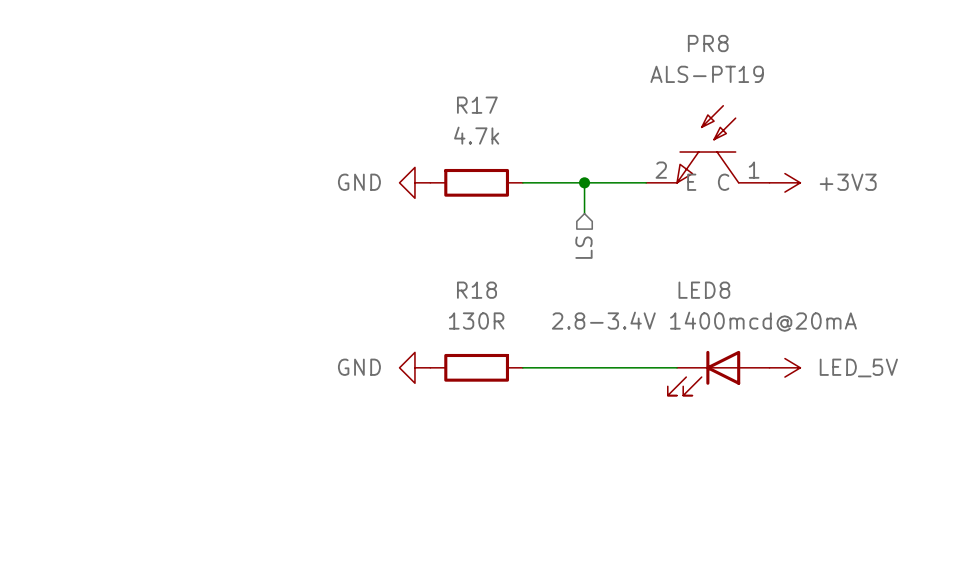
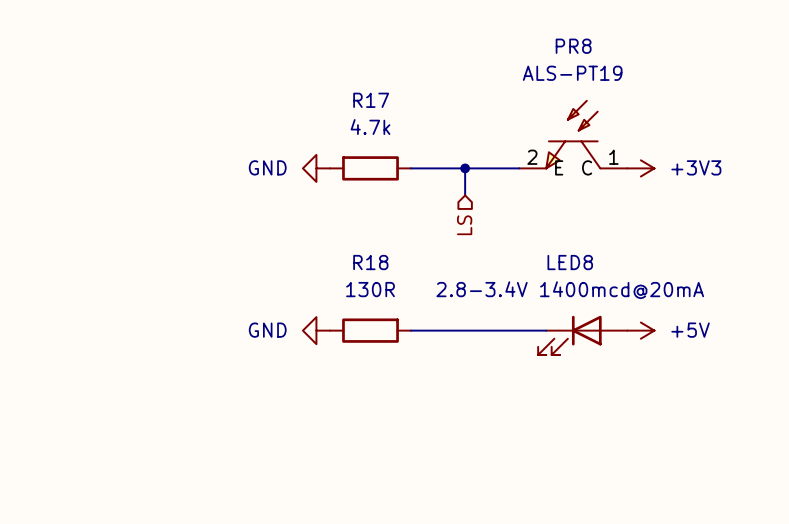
power symbol: LED_5V (784, 367) -> +5V (640, 330)

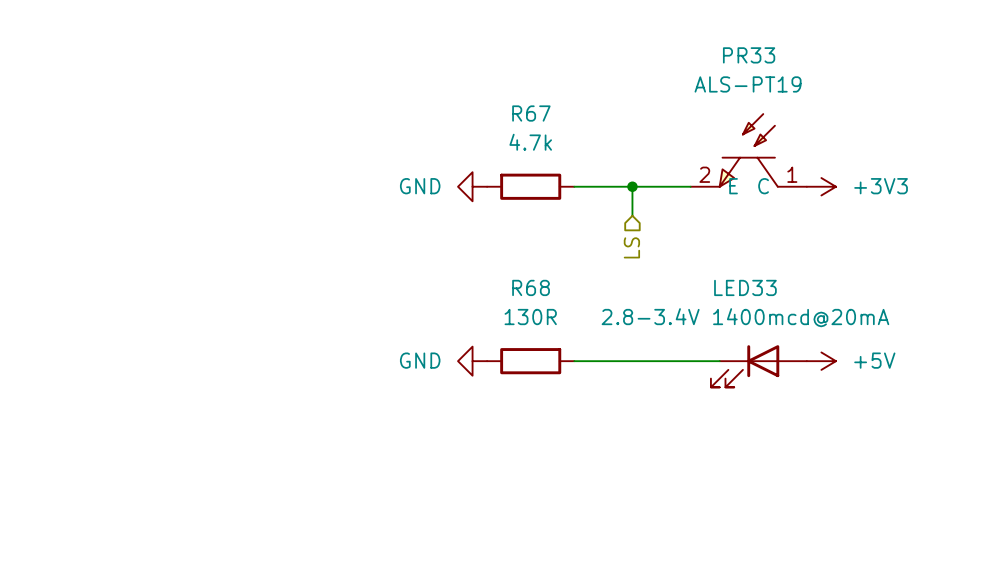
PR8 name: PR8 (573, 46) -> PR33 (749, 55)
R17 name: R17 (371, 100) -> R67 (531, 113)
R18 name: R18 (370, 262) -> R68 (531, 287)
LED8 name: LED8 (570, 262) -> LED33 (745, 287)

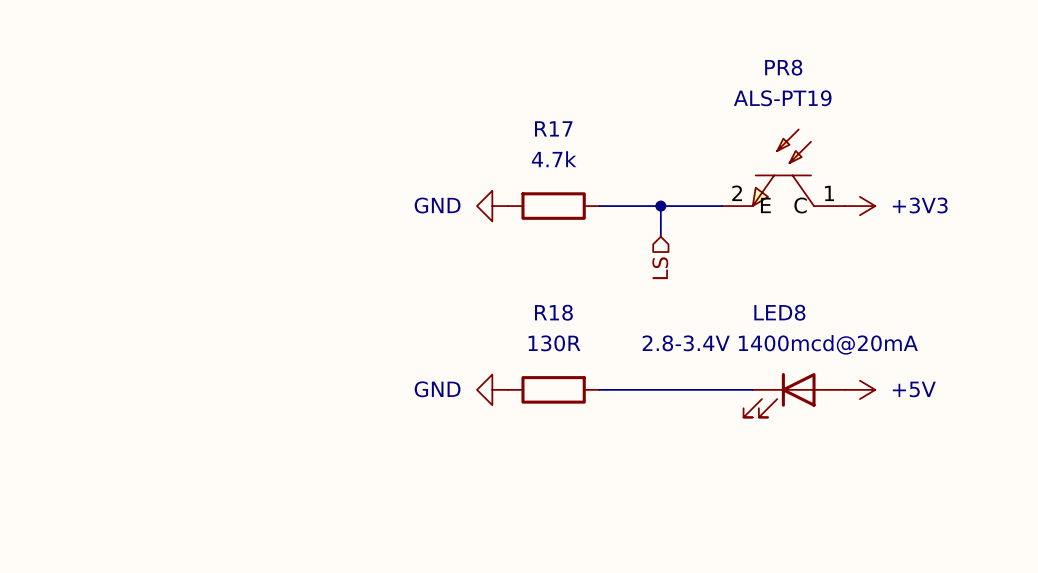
PR33 name: PR33 (749, 55) -> PR8 (783, 67)
R67 name: R67 (531, 113) -> R17 (553, 128)
R68 name: R68 (531, 287) -> R18 (553, 312)
LED33 name: LED33 (745, 287) -> LED8 (779, 312)

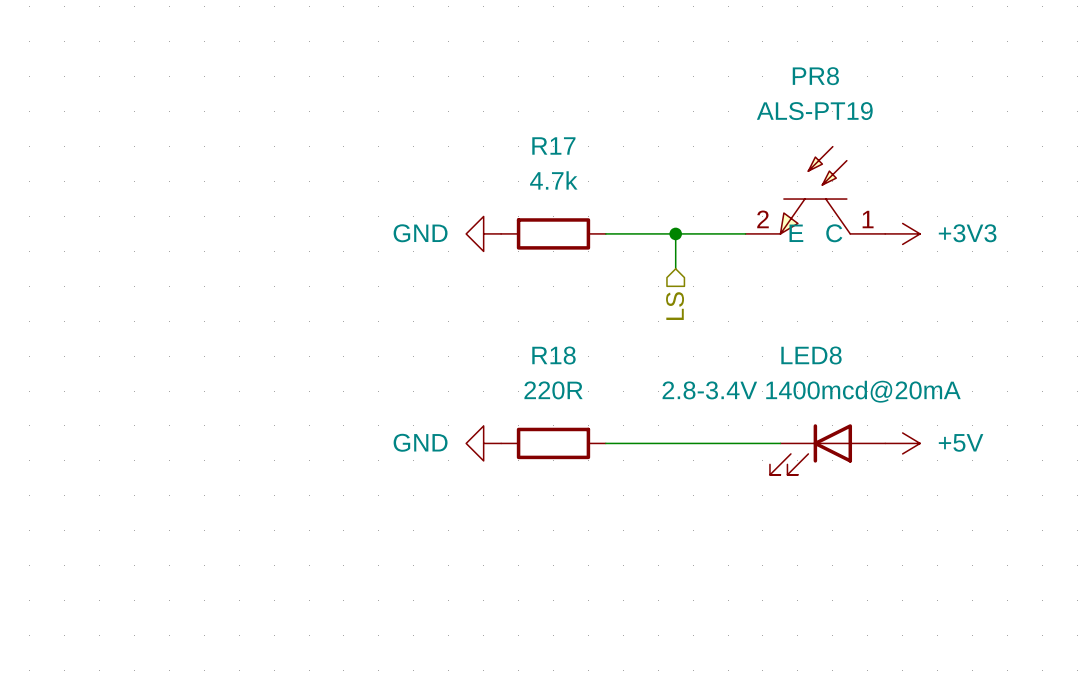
R18 value: 130R (554, 343) -> 220R (553, 390)

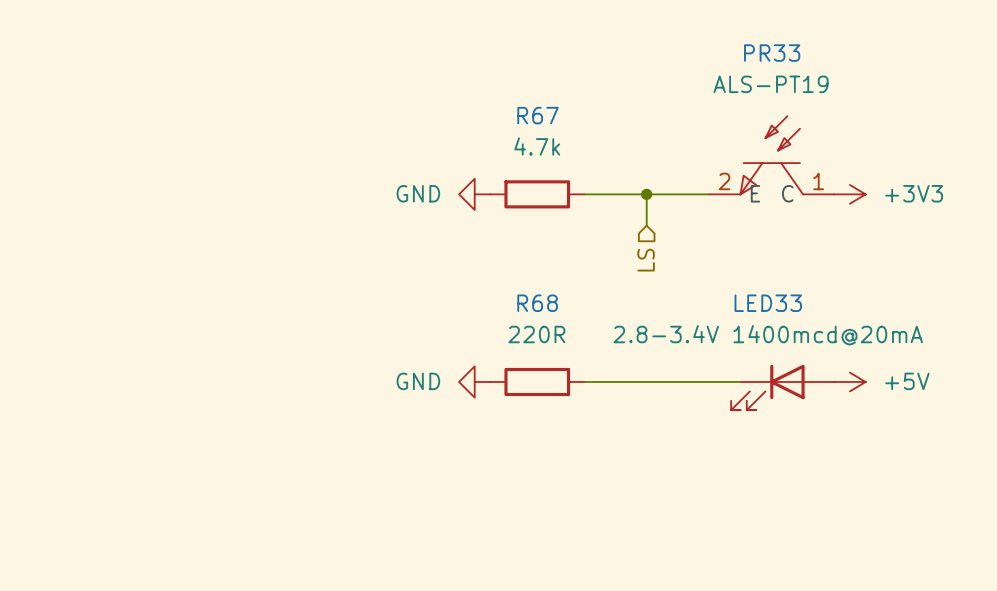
PR8 name: PR8 (815, 76) -> PR33 (772, 53)
R17 name: R17 (553, 145) -> R67 (537, 115)
R18 name: R18 (553, 355) -> R68 (537, 303)
LED8 name: LED8 (811, 355) -> LED33 (768, 303)

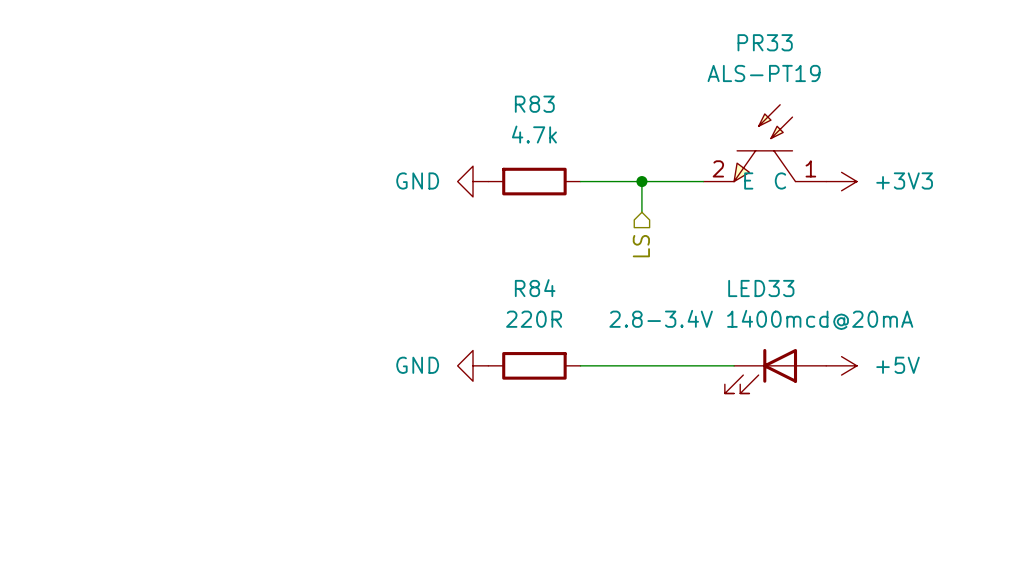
R67 name: R67 (537, 115) -> R83 (534, 104)
R68 name: R68 (537, 303) -> R84 (535, 288)

